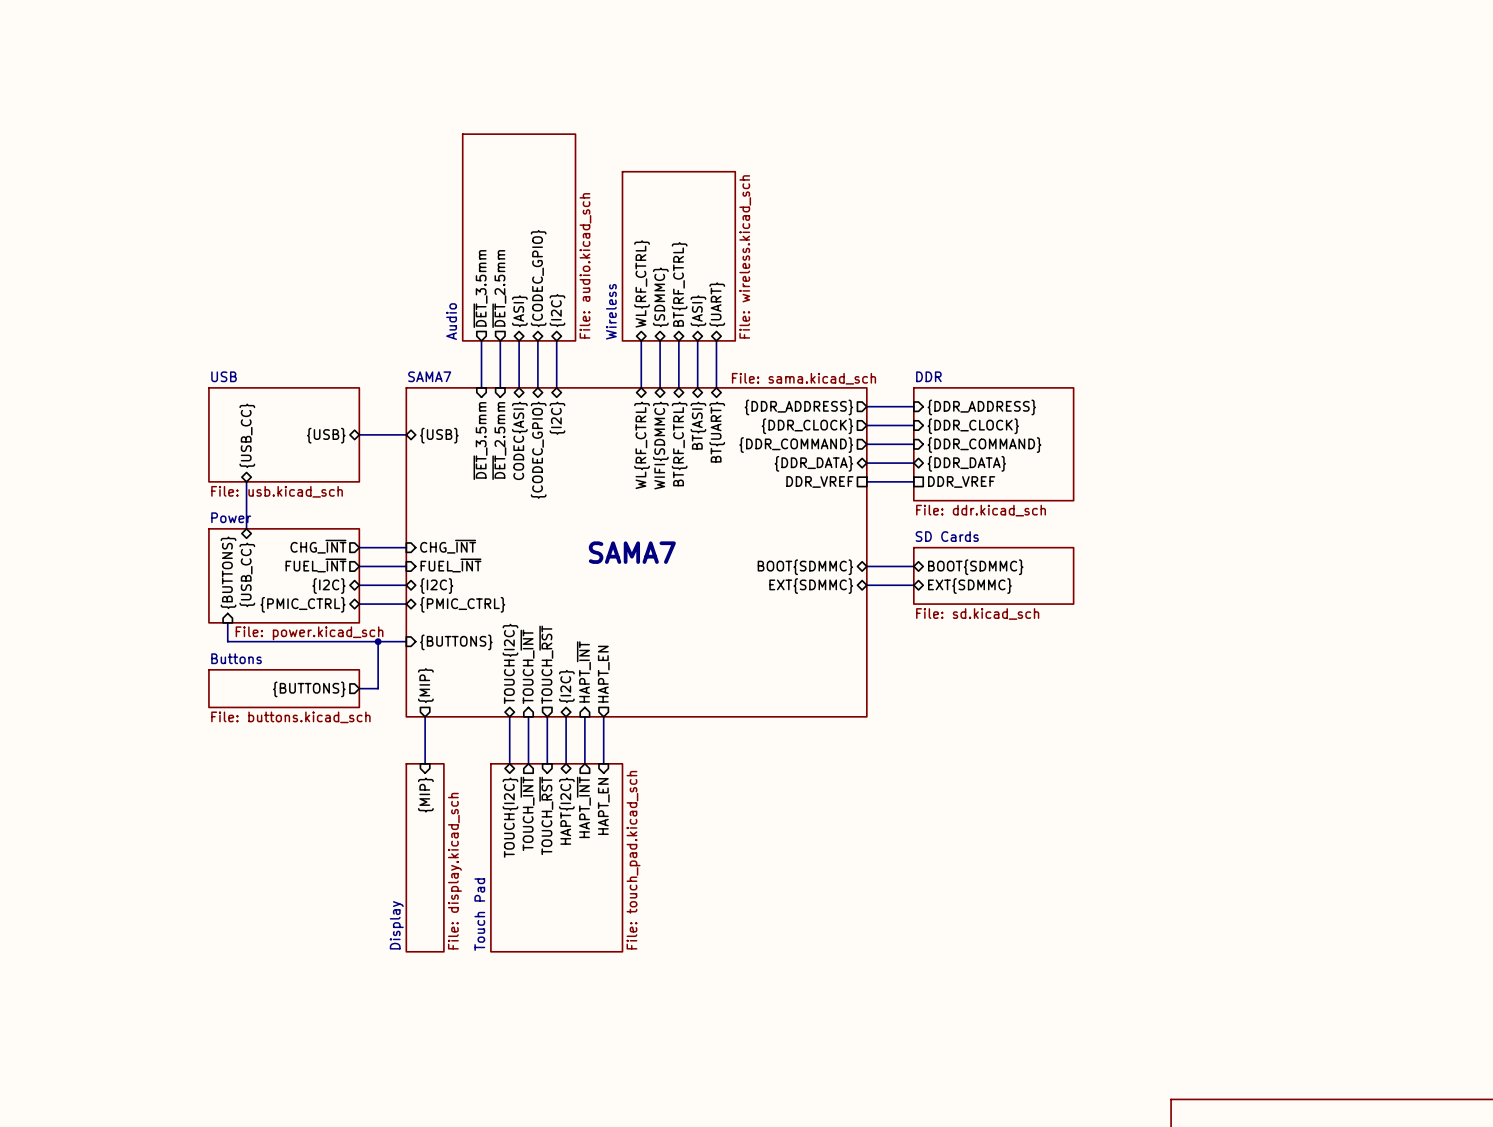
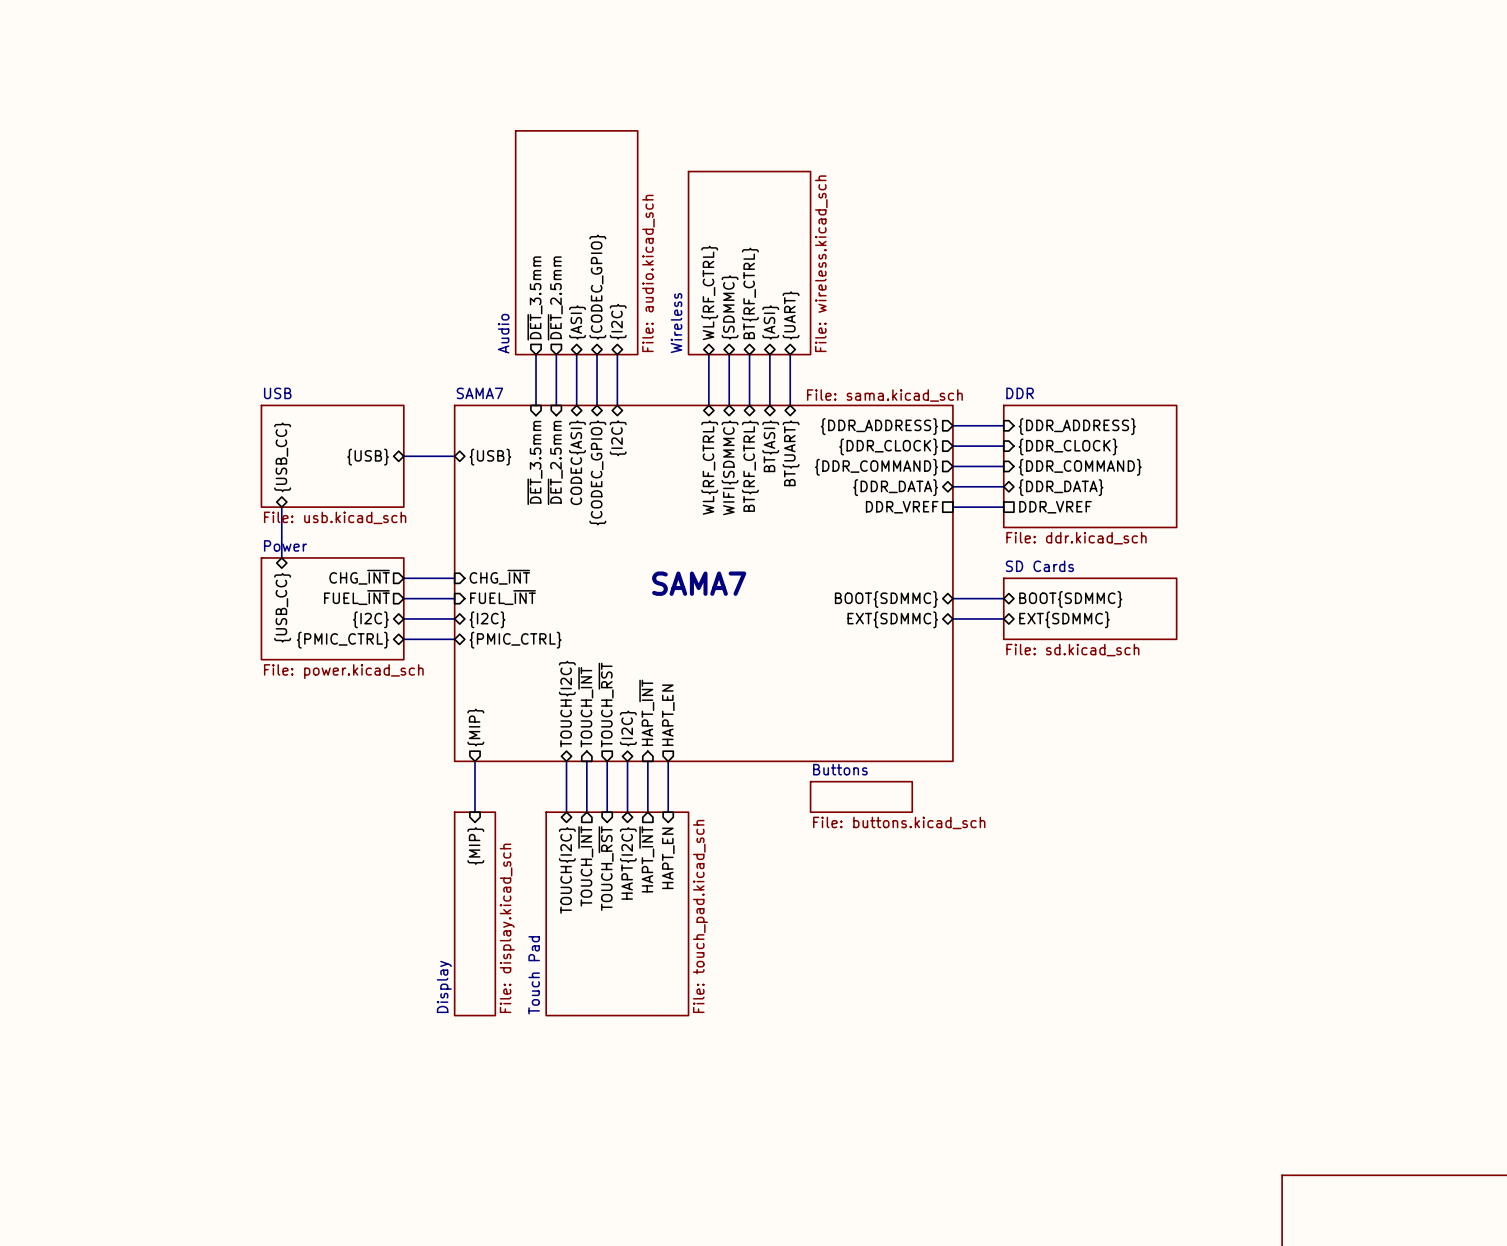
sheet USB: File: usb.kicad_sch (284, 434) -> none
sheet USB: none -> File: usb.kicad_sch (332, 456)
sheet pin: {BUTTONS} (228, 572) -> none
sheet Power: File: power.kicad_sch (284, 575) -> none
sheet Power: none -> File: power.kicad_sch (332, 608)
bus: (227, 622) (227, 641) (406, 641) -> none
bus: (378, 641) (378, 688) (359, 688) -> none
junction: (378, 641) -> none
sheet pin: {BUTTONS} (456, 642) -> none
sheet Buttons: File: buttons.kicad_sch (284, 688) -> none
sheet pin: {BUTTONS} (309, 689) -> none
sheet Buttons: none -> File: buttons.kicad_sch (861, 796)

